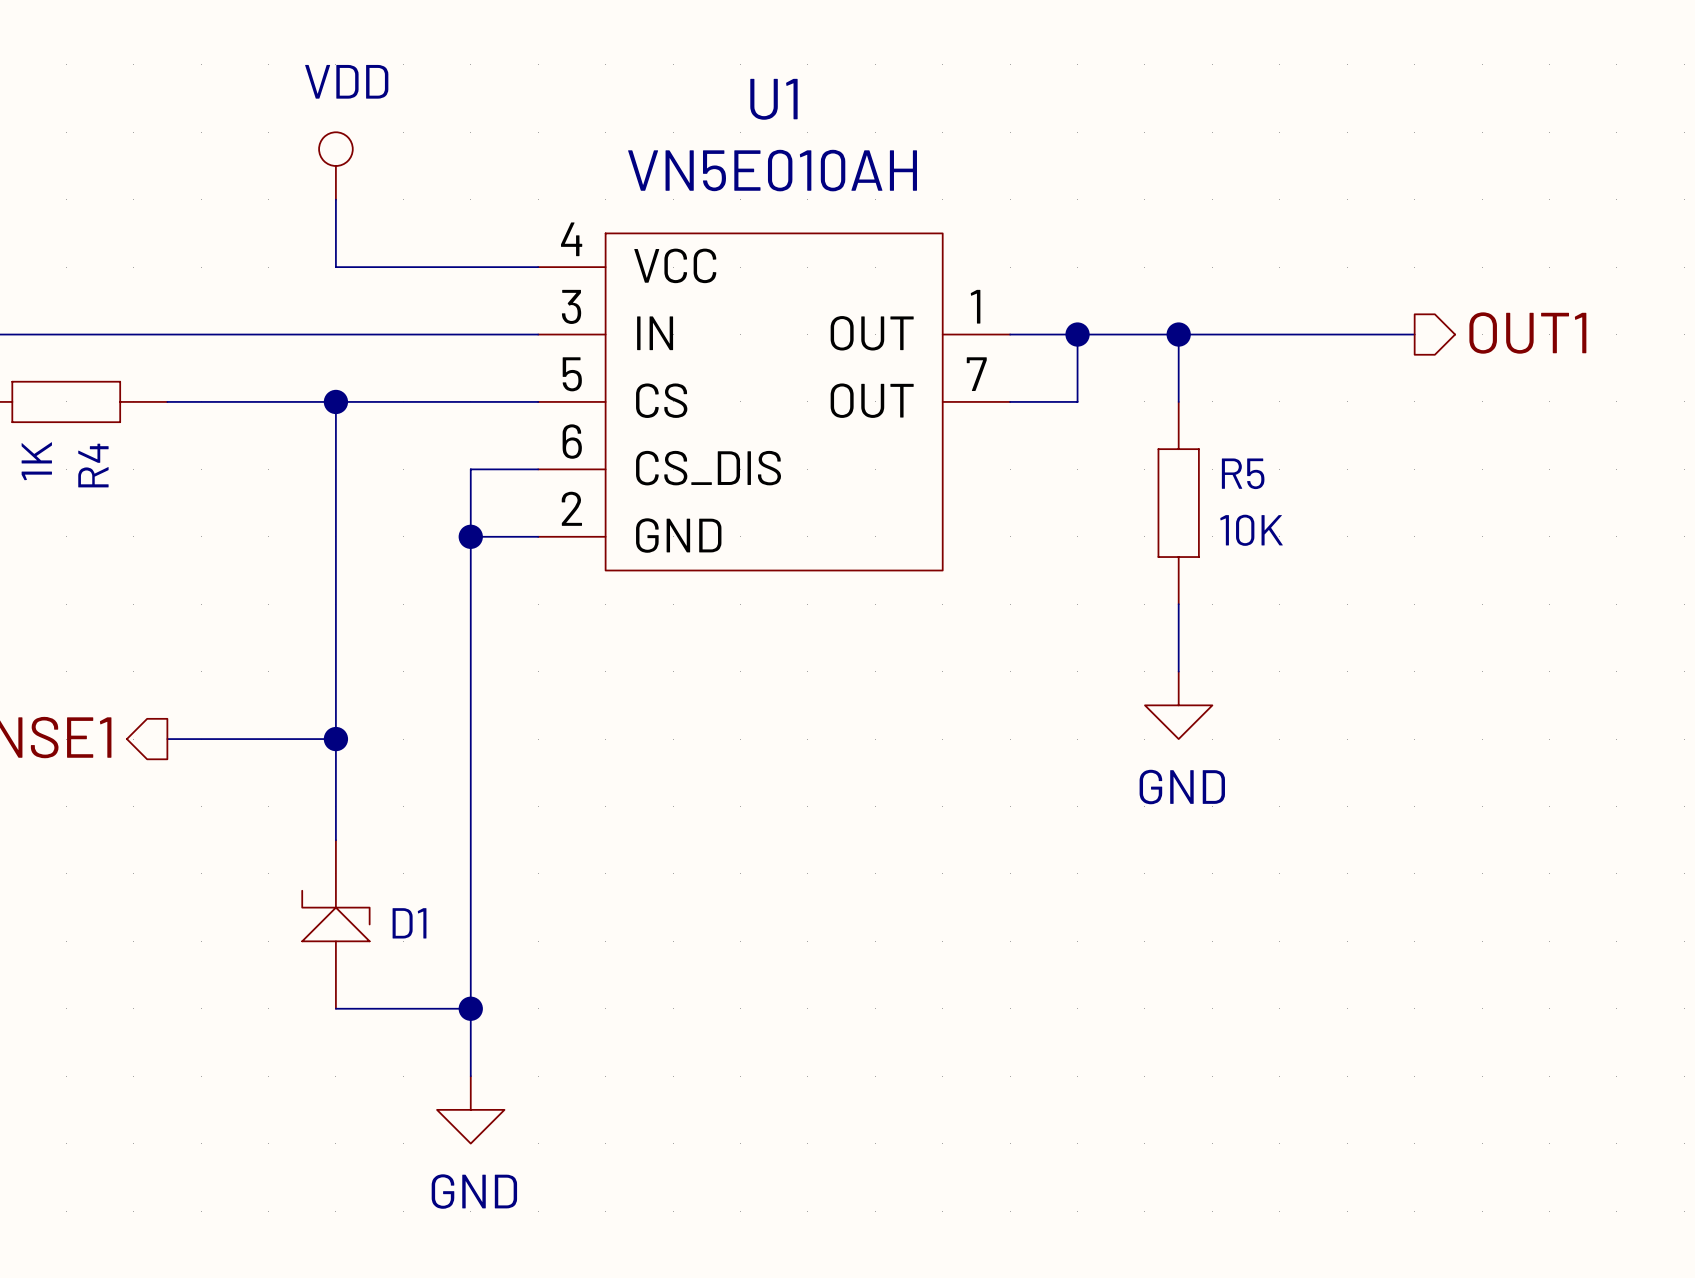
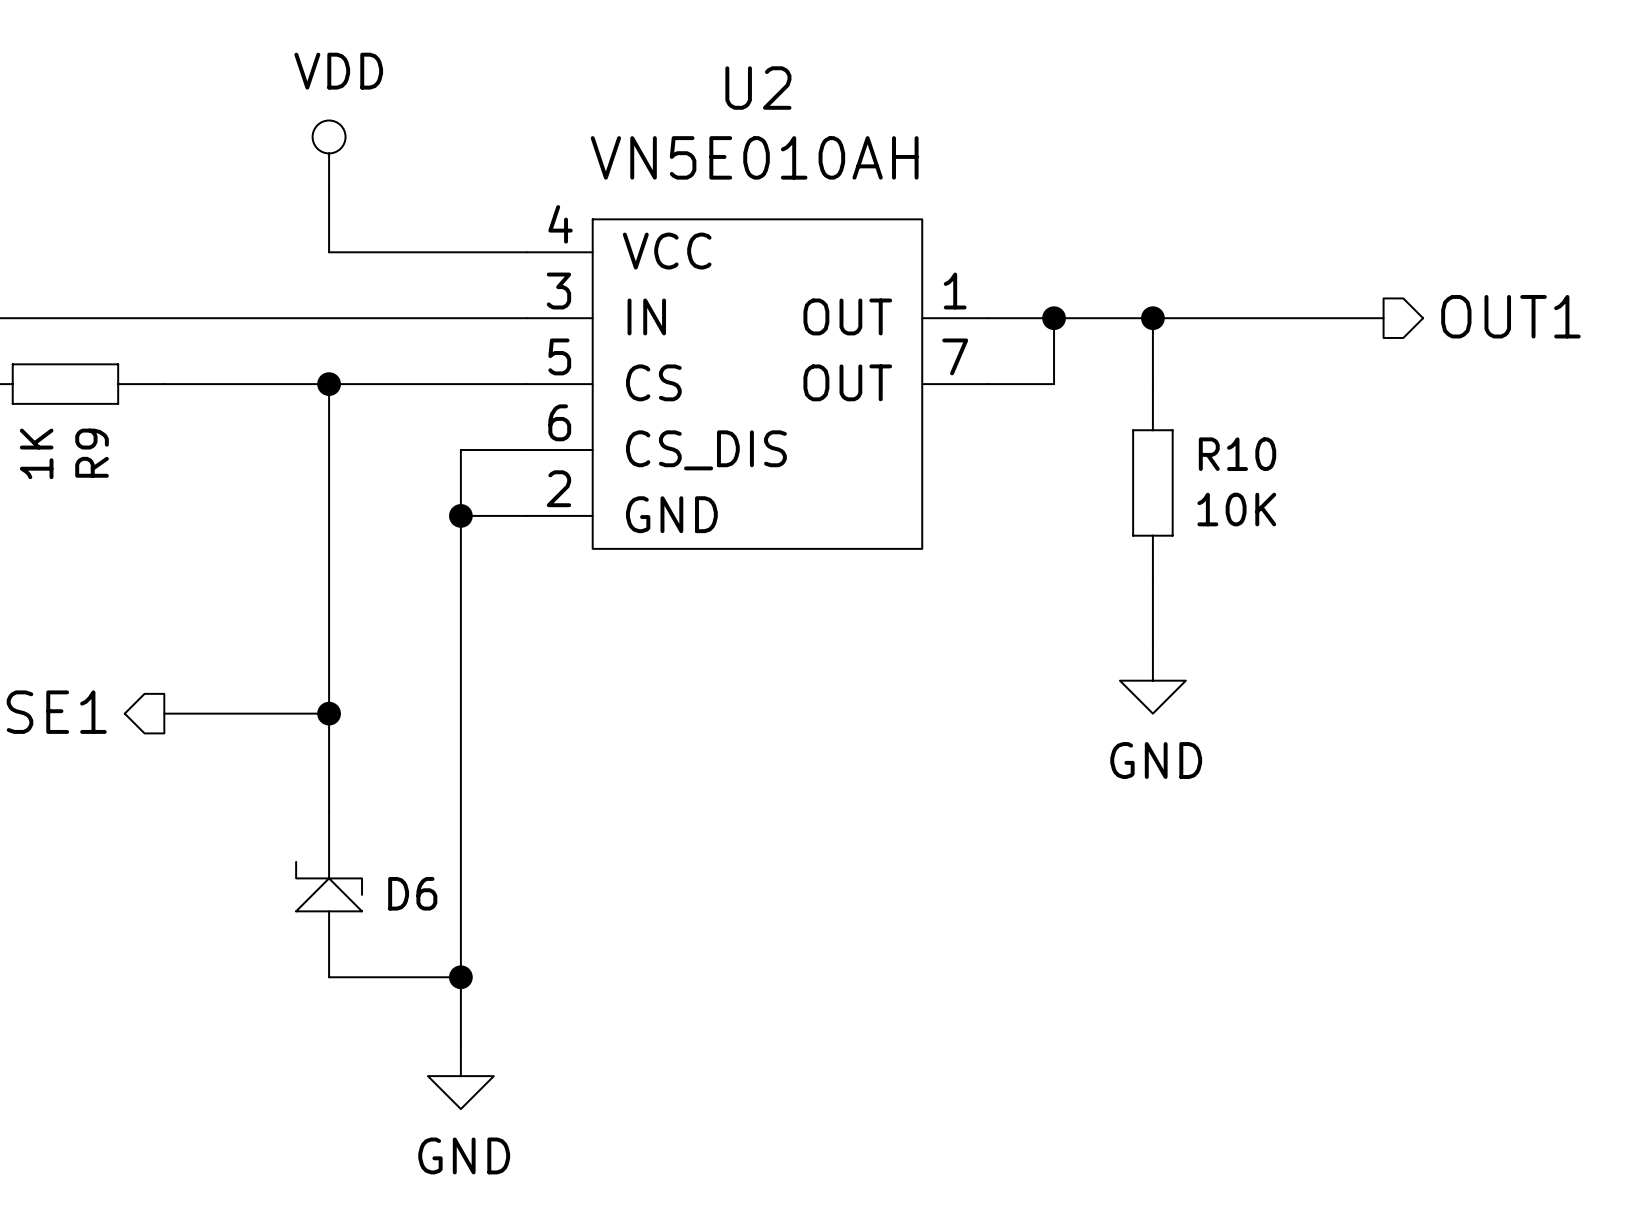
U1 name: U1 (773, 99) -> U2 (758, 88)
R4 name: R4 (93, 465) -> R9 (92, 453)
R5 name: R5 (1243, 473) -> R10 (1237, 454)
D1 name: D1 (409, 923) -> D6 (412, 893)

